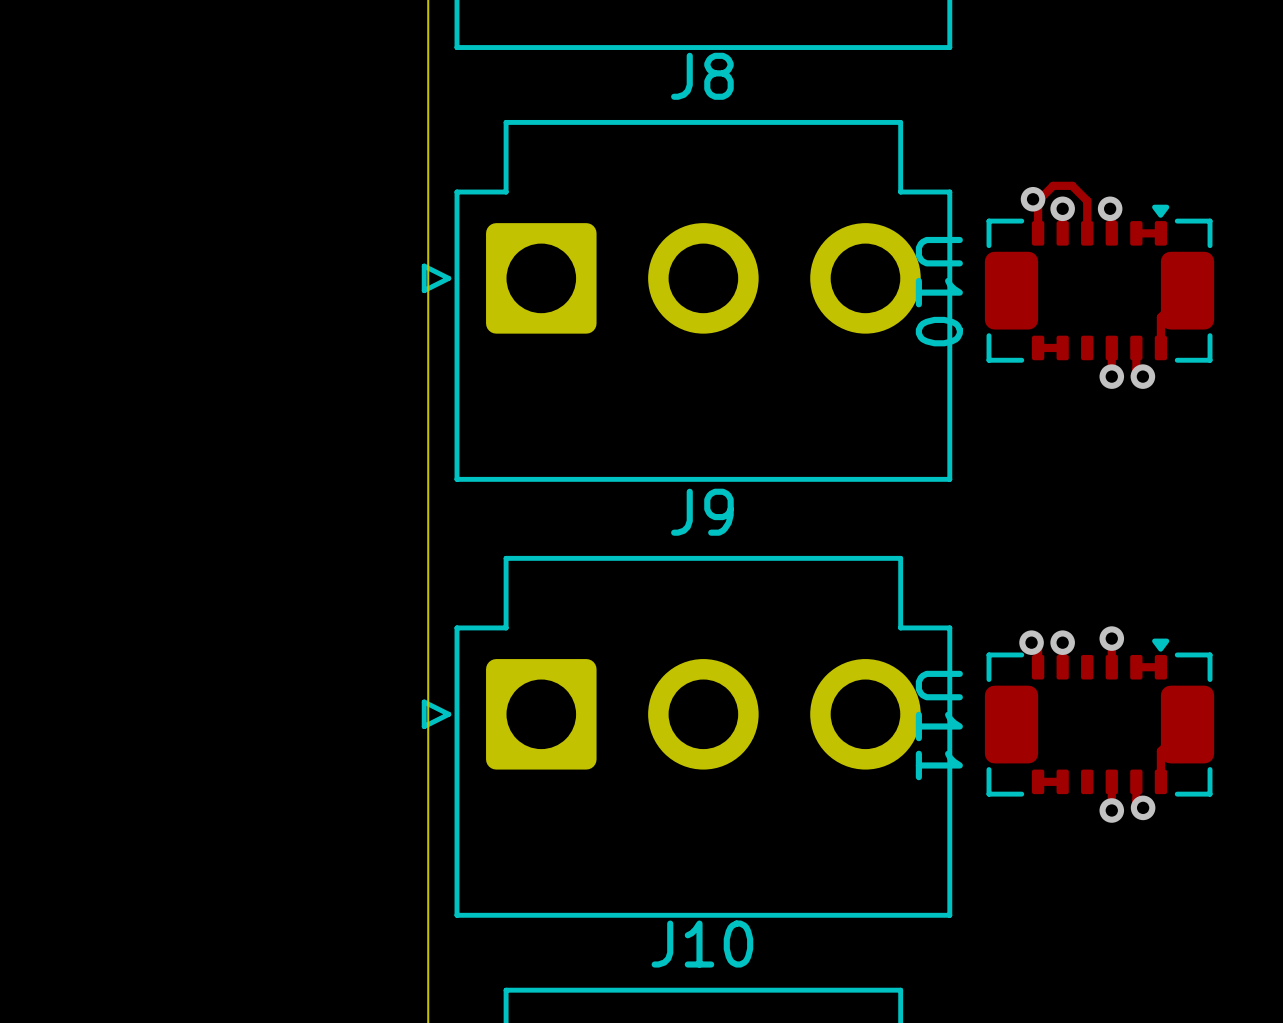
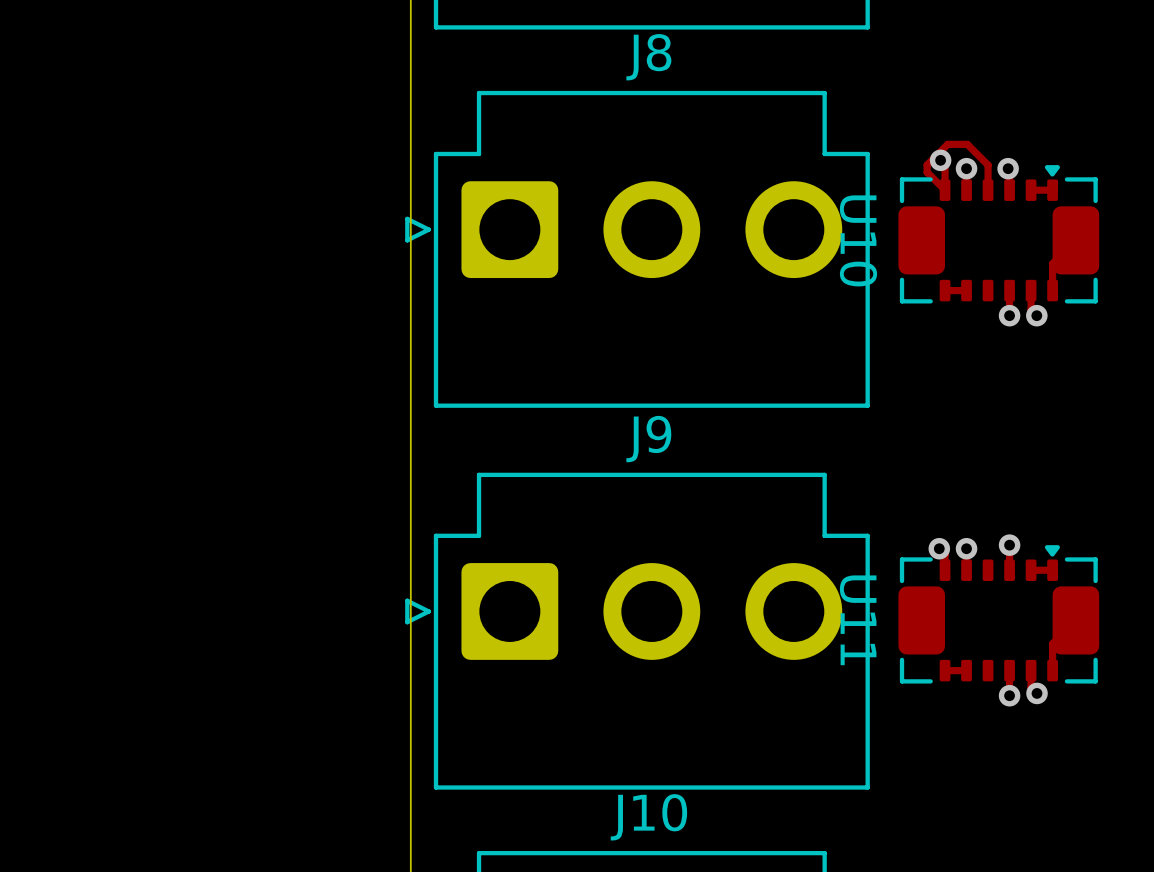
top track: (1033, 199) (1038, 200) (1053, 185) (1072, 185) (1087, 200) (1087, 204) -> (945, 190) (927, 172) (927, 165) (947, 144) (967, 144) (988, 165)

